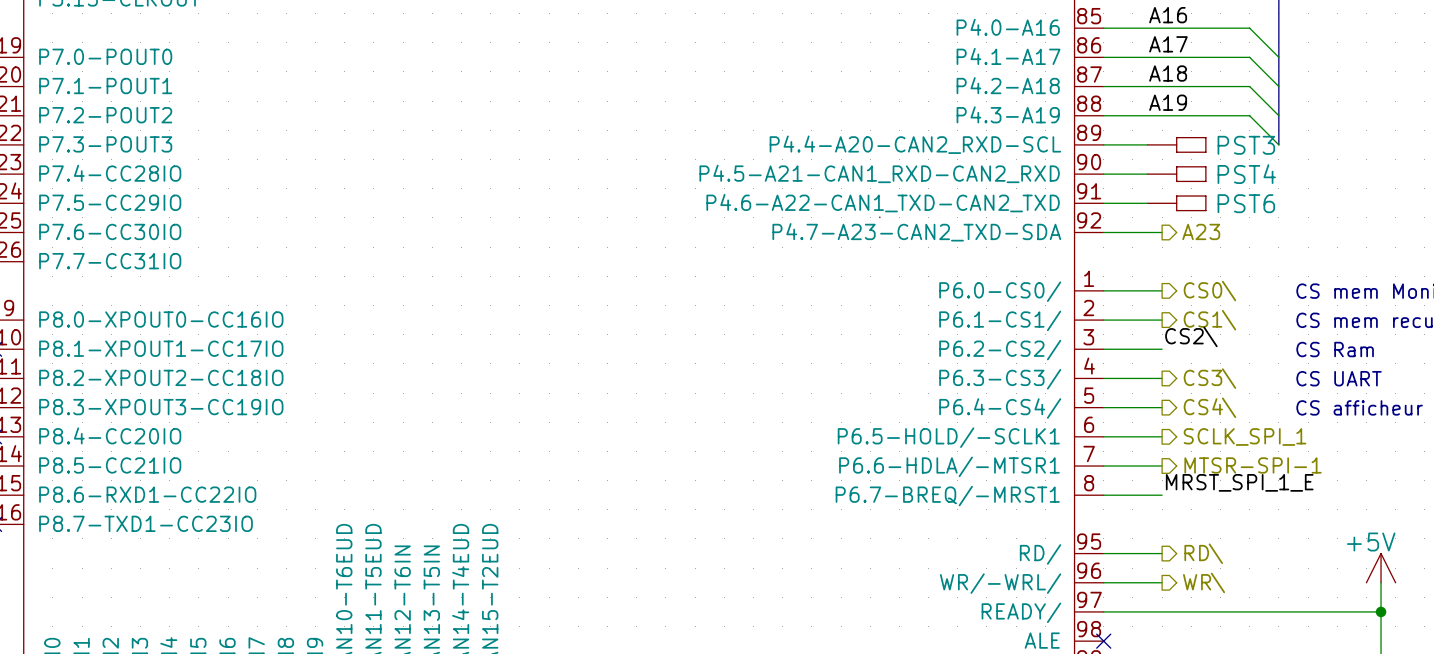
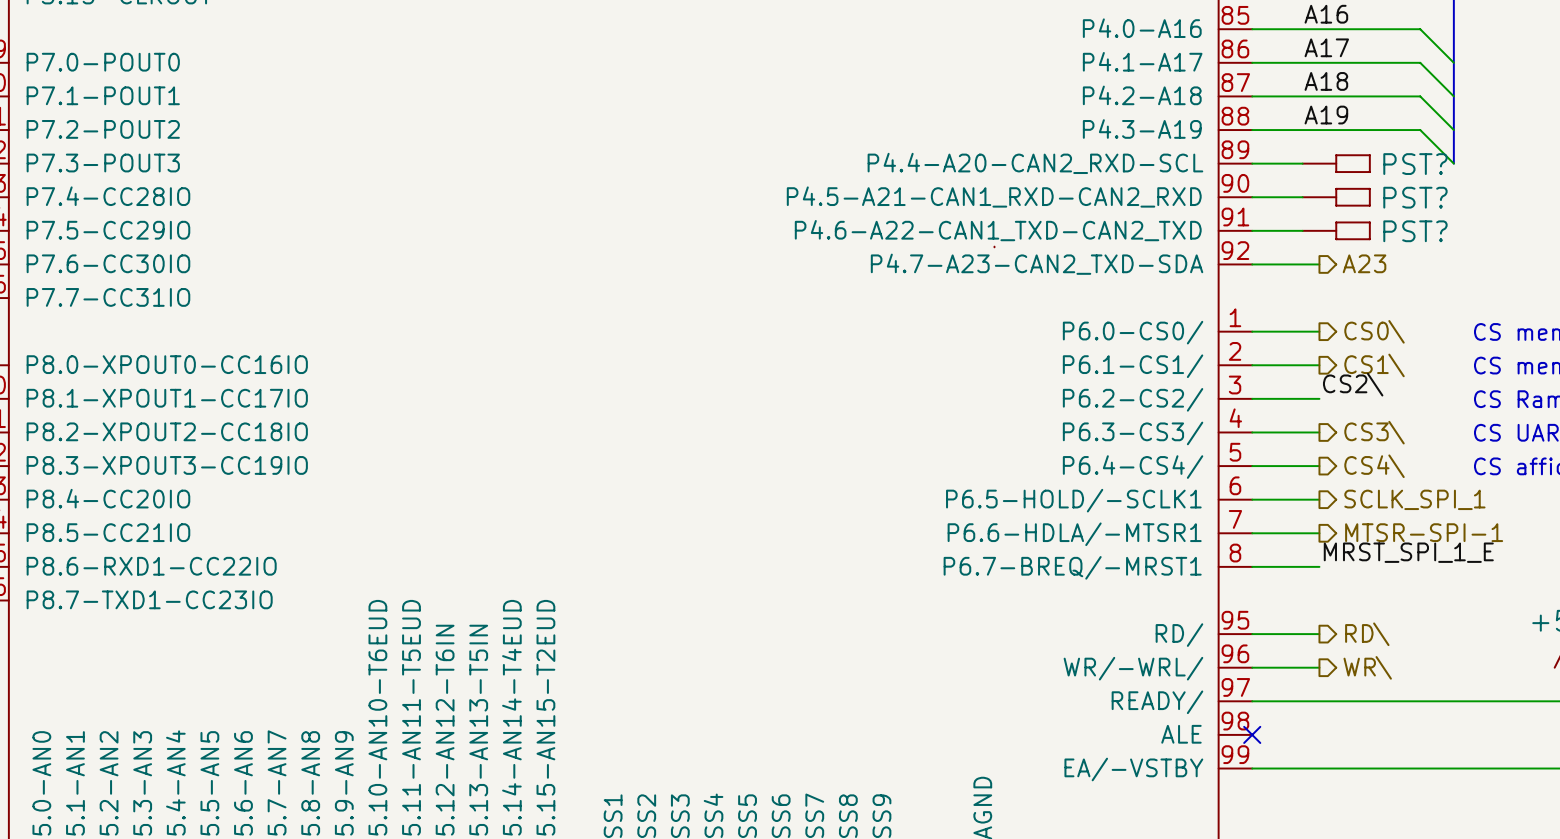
PST3 name: PST3 (1246, 145) -> PST? (1415, 164)
PST4 name: PST4 (1246, 174) -> PST? (1415, 197)
PST6 name: PST6 (1246, 203) -> PST? (1415, 231)

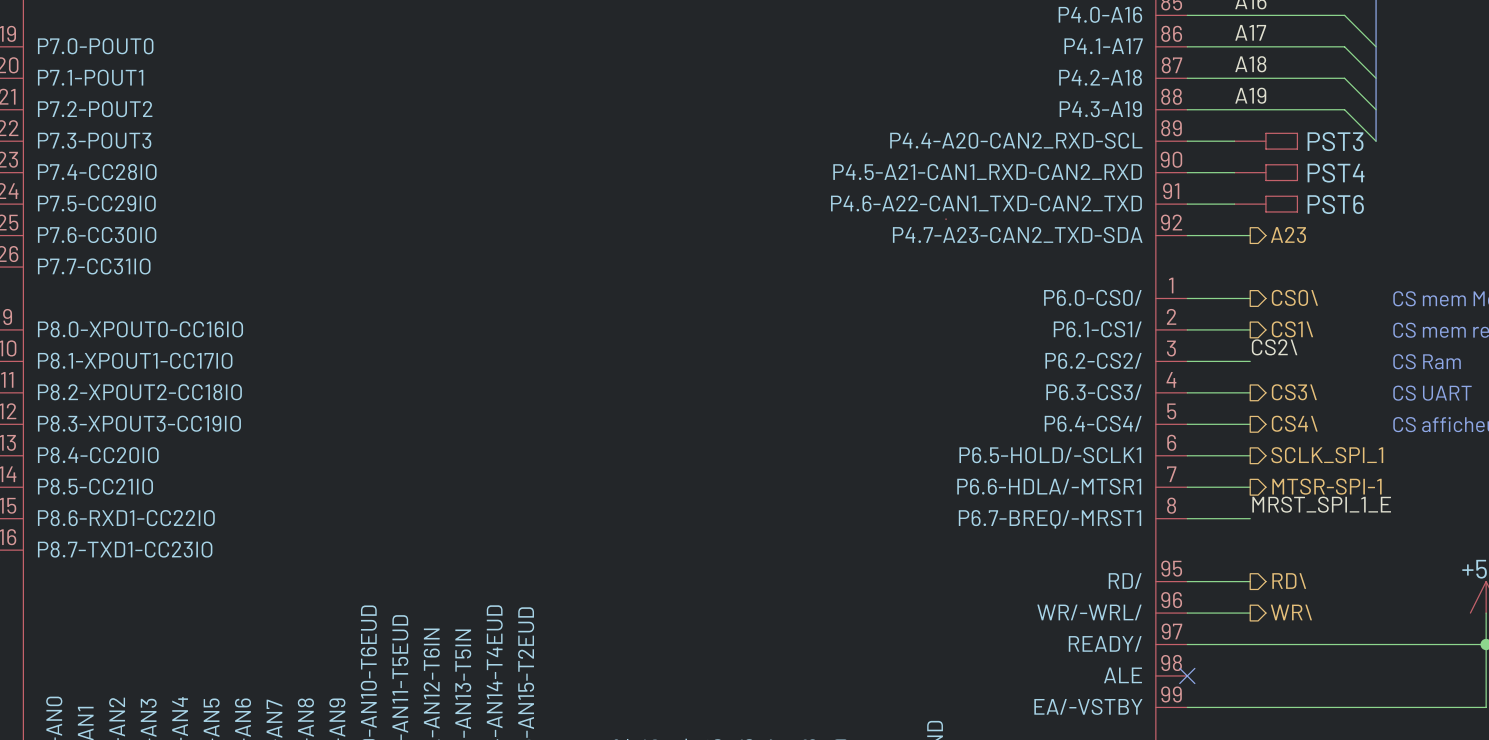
PST? name: PST? (1415, 164) -> PST3 (1335, 141)
PST? name: PST? (1415, 197) -> PST4 (1336, 173)
PST? name: PST? (1415, 231) -> PST6 (1335, 204)

